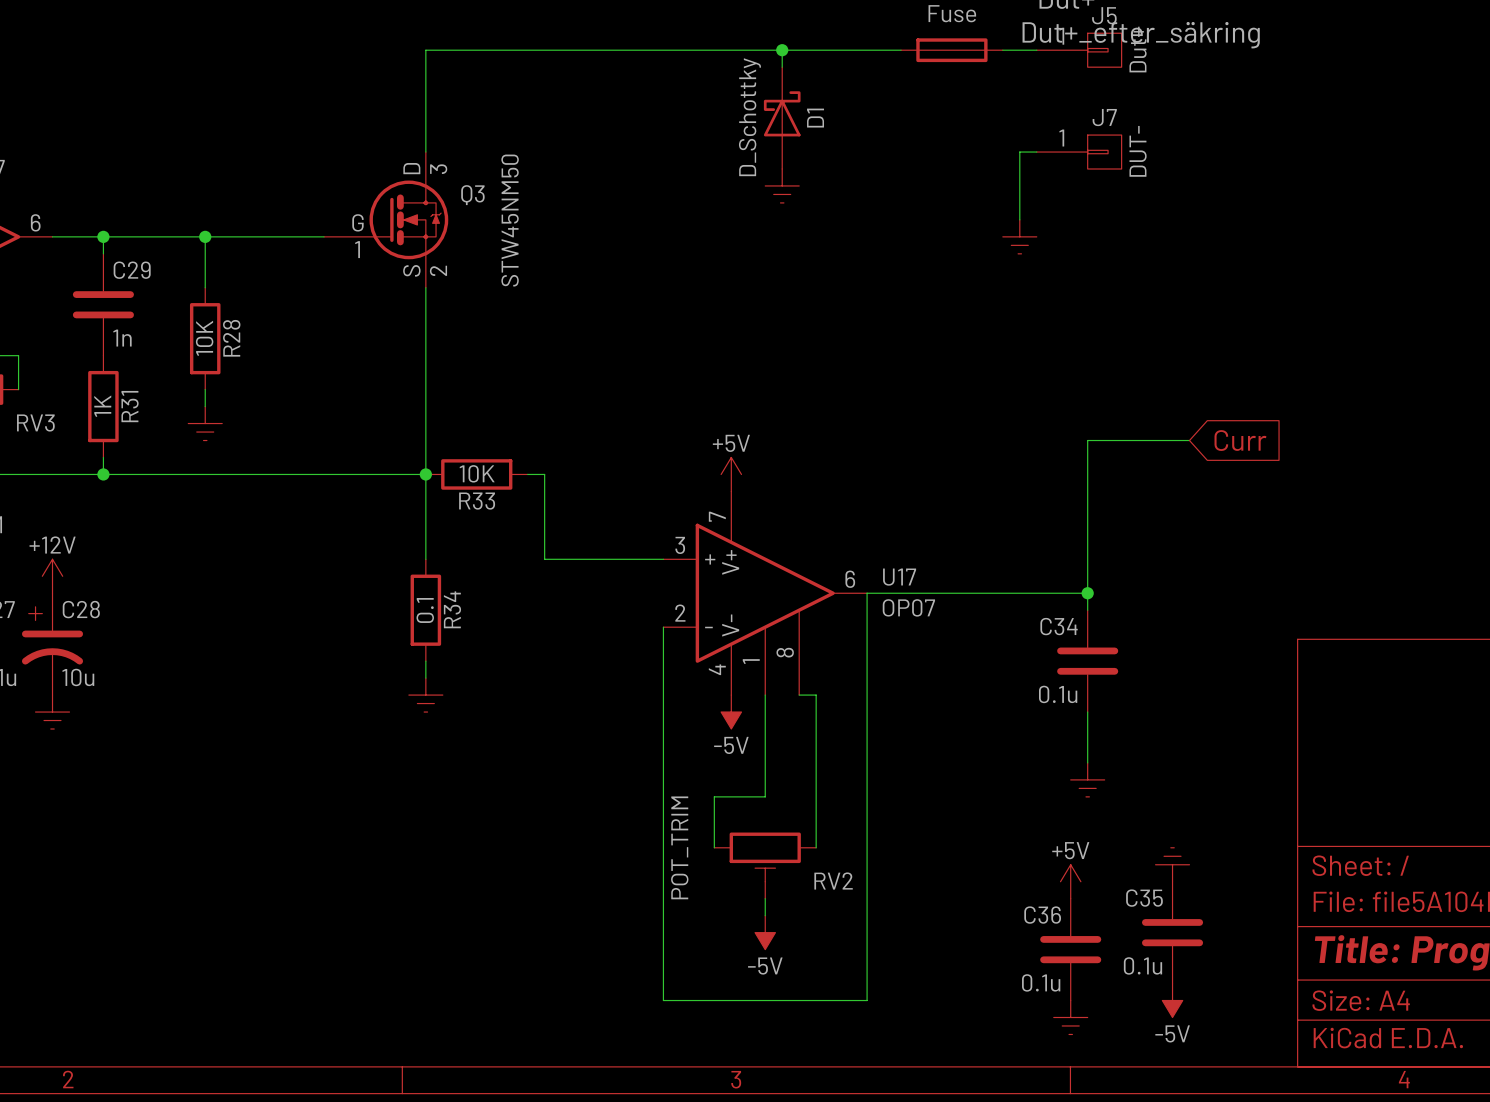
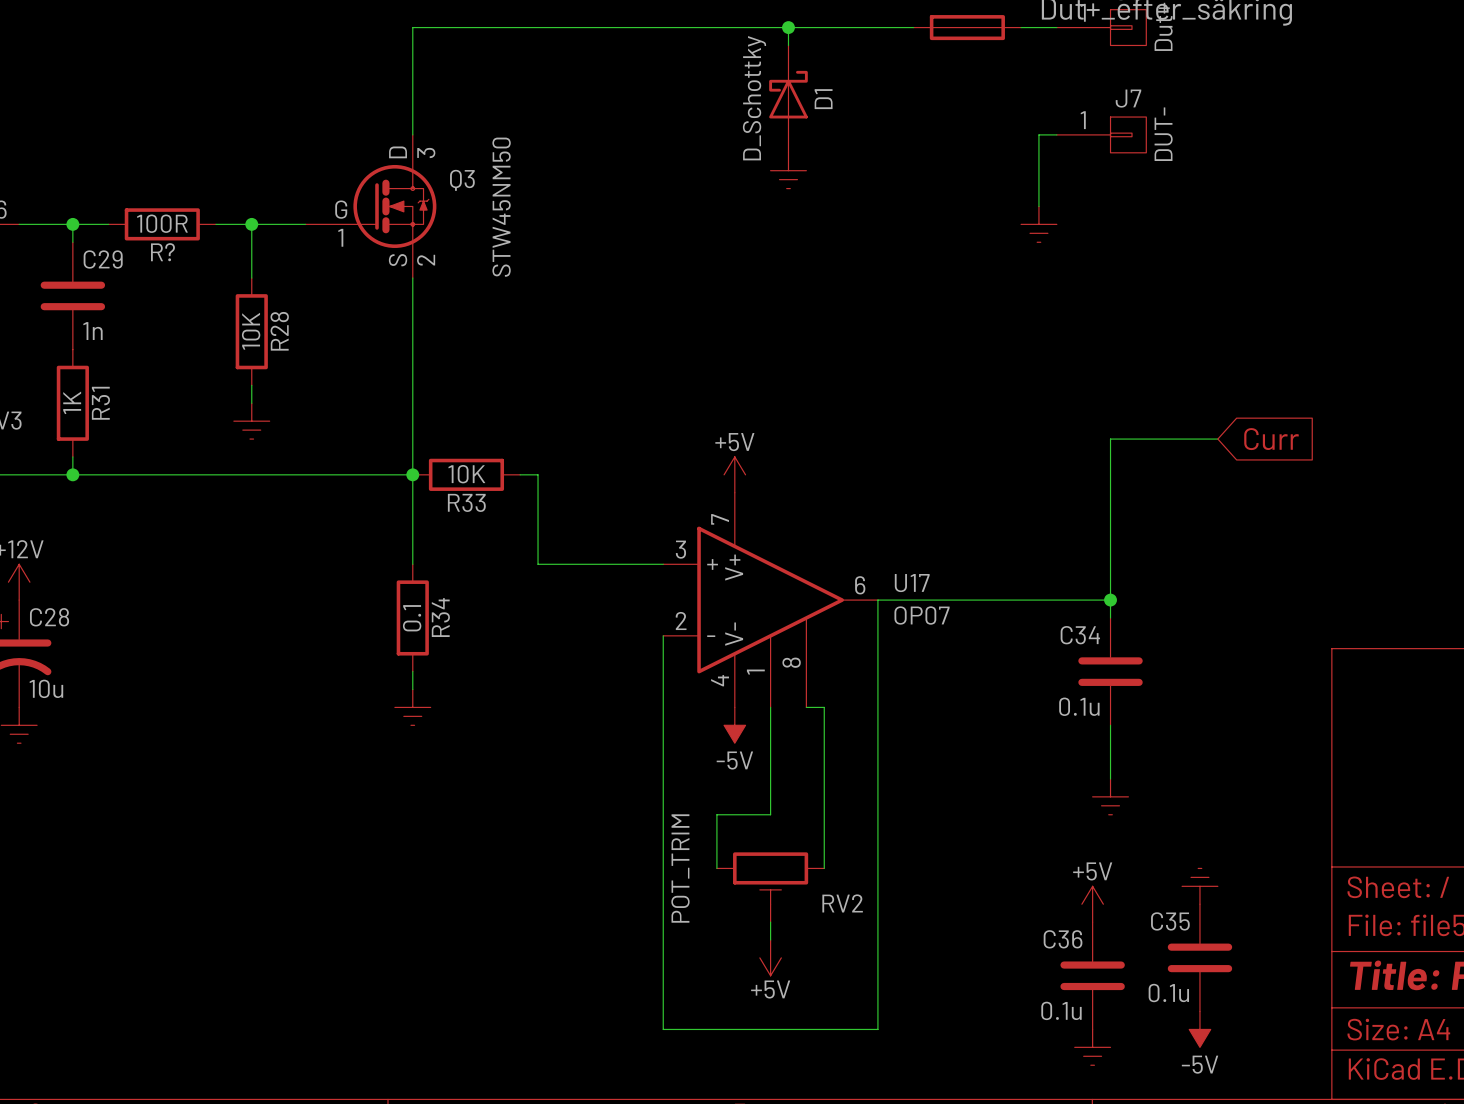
wire: (137, 236) (239, 236) -> none
R?: none -> 100R (162, 224)
wire: (205, 236) (205, 287) -> (251, 224) (251, 278)
junction position: (205, 236) -> (251, 224)
R28 position: (205, 338) -> (251, 331)
wire: (205, 389) (205, 406) -> (251, 385) (251, 403)
power symbol position: (205, 423) -> (251, 421)
power symbol: -5V (765, 932) -> +5V (770, 957)

